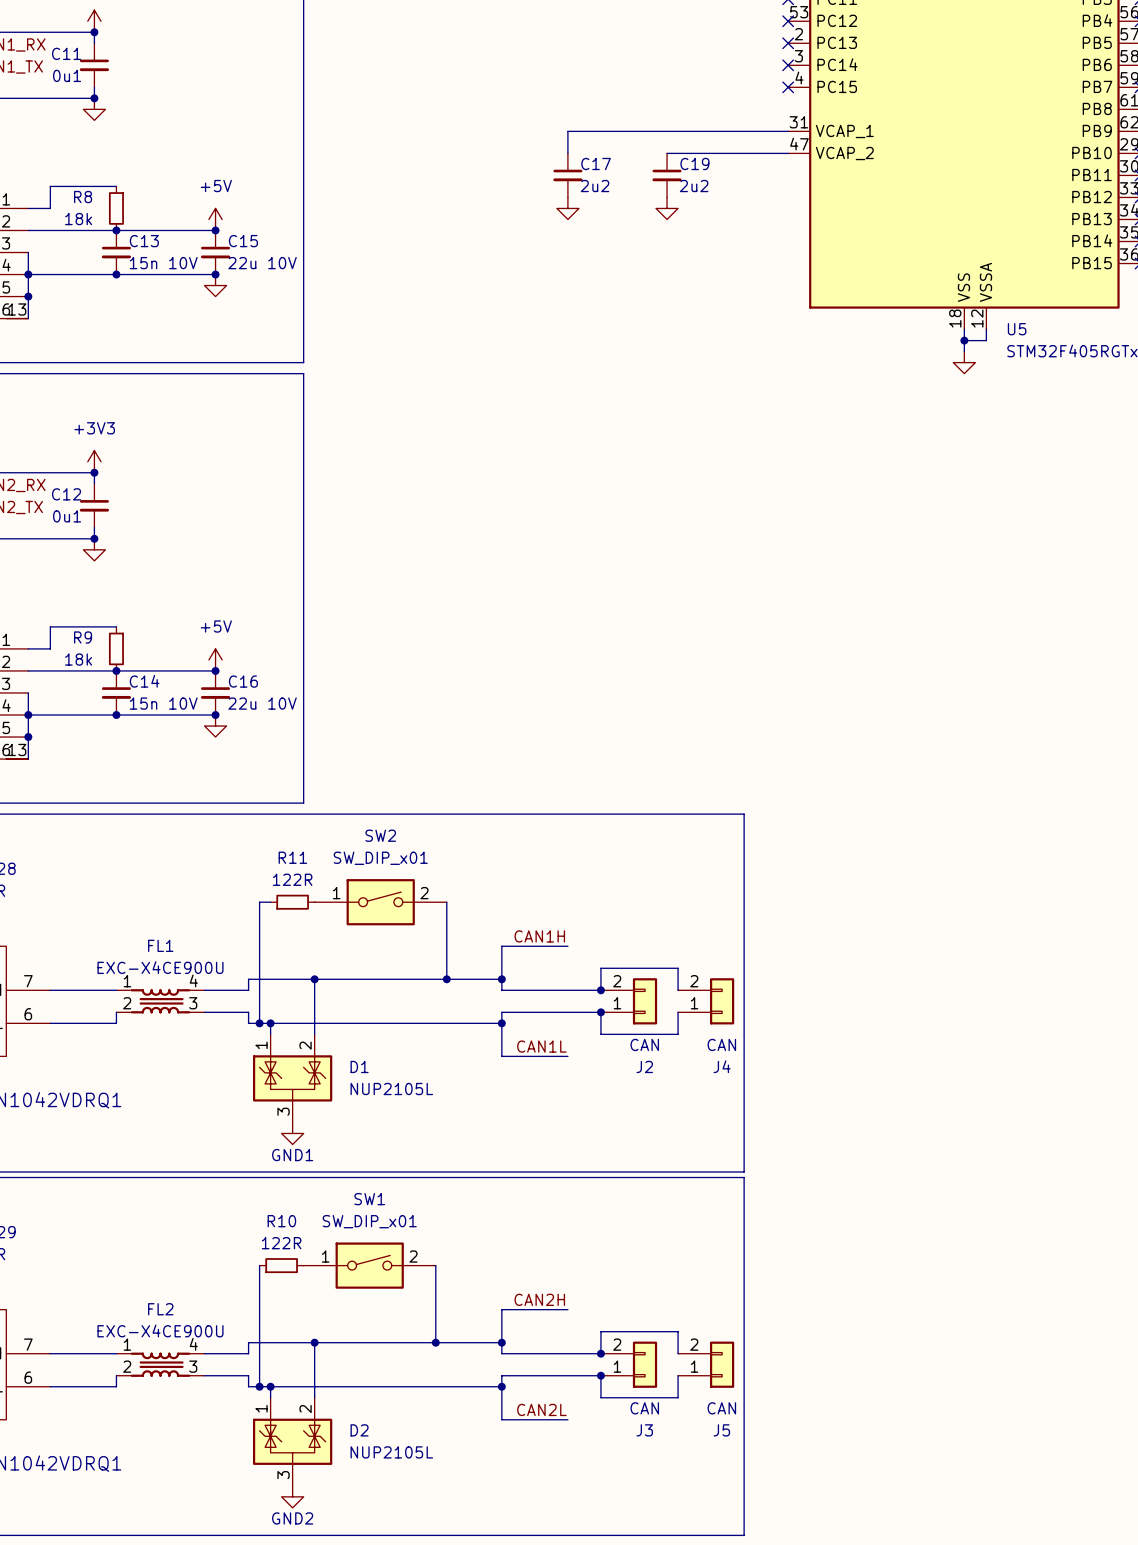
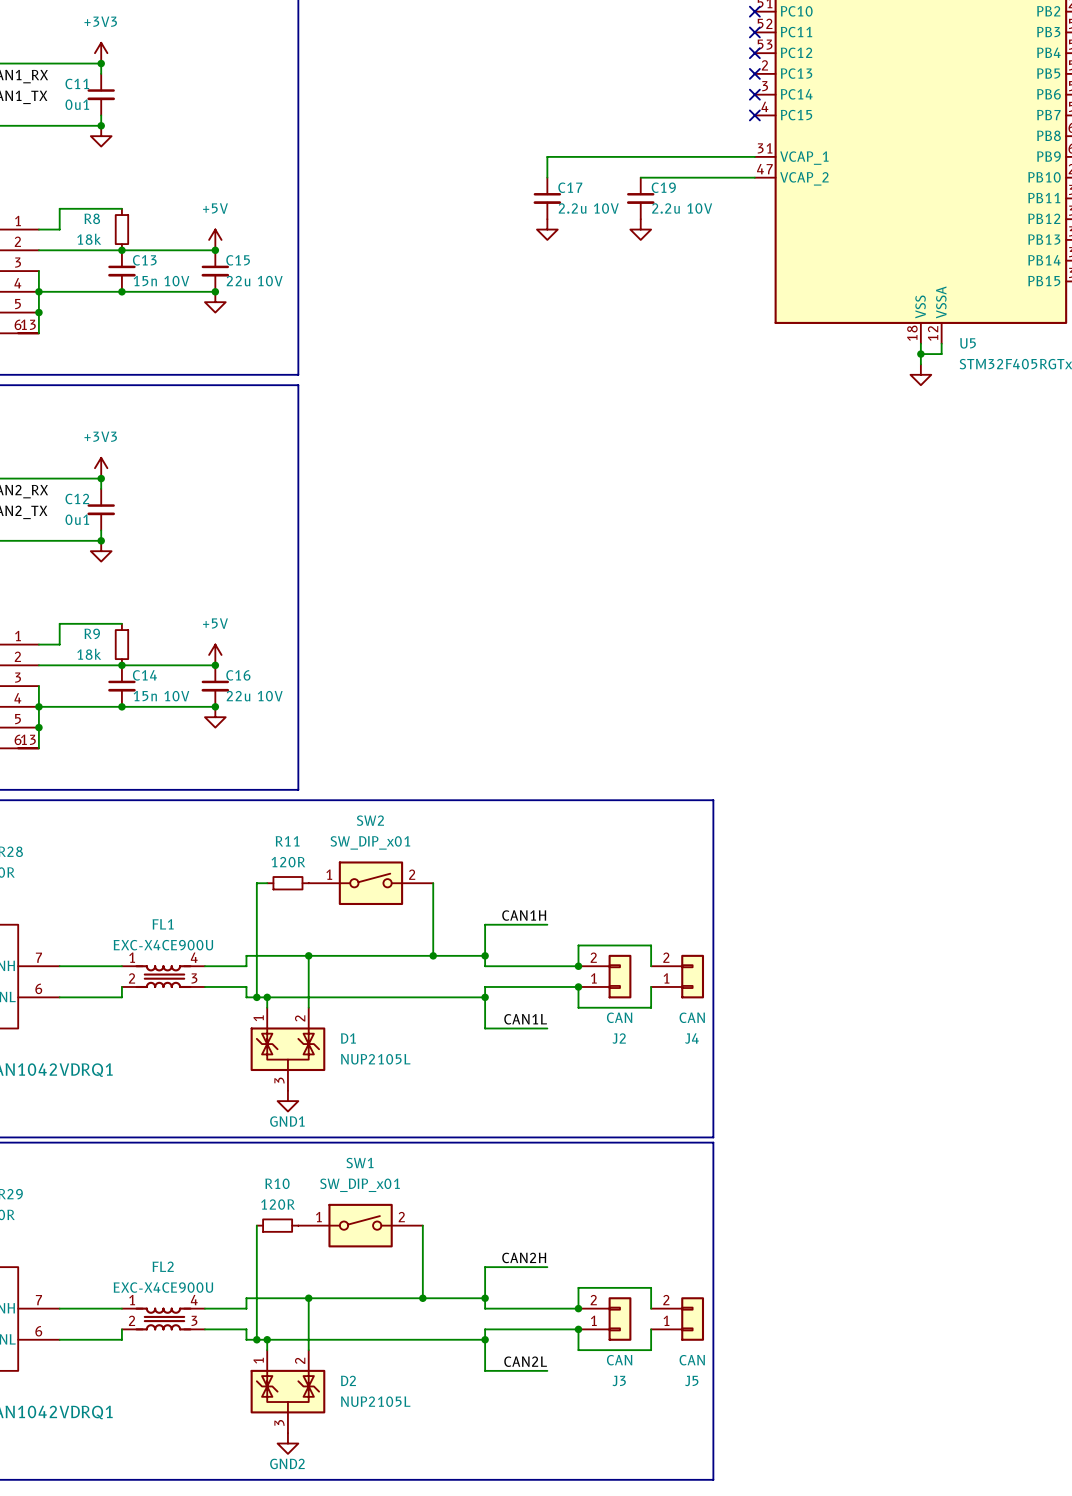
C17 value: 2u2 (595, 186) -> 2.2u 10V (588, 208)
C19 value: 2u2 (694, 186) -> 2.2u 10V (682, 208)
R11 value: 122R (292, 879) -> 120R (288, 862)
R10 value: 122R (281, 1243) -> 120R (278, 1204)

